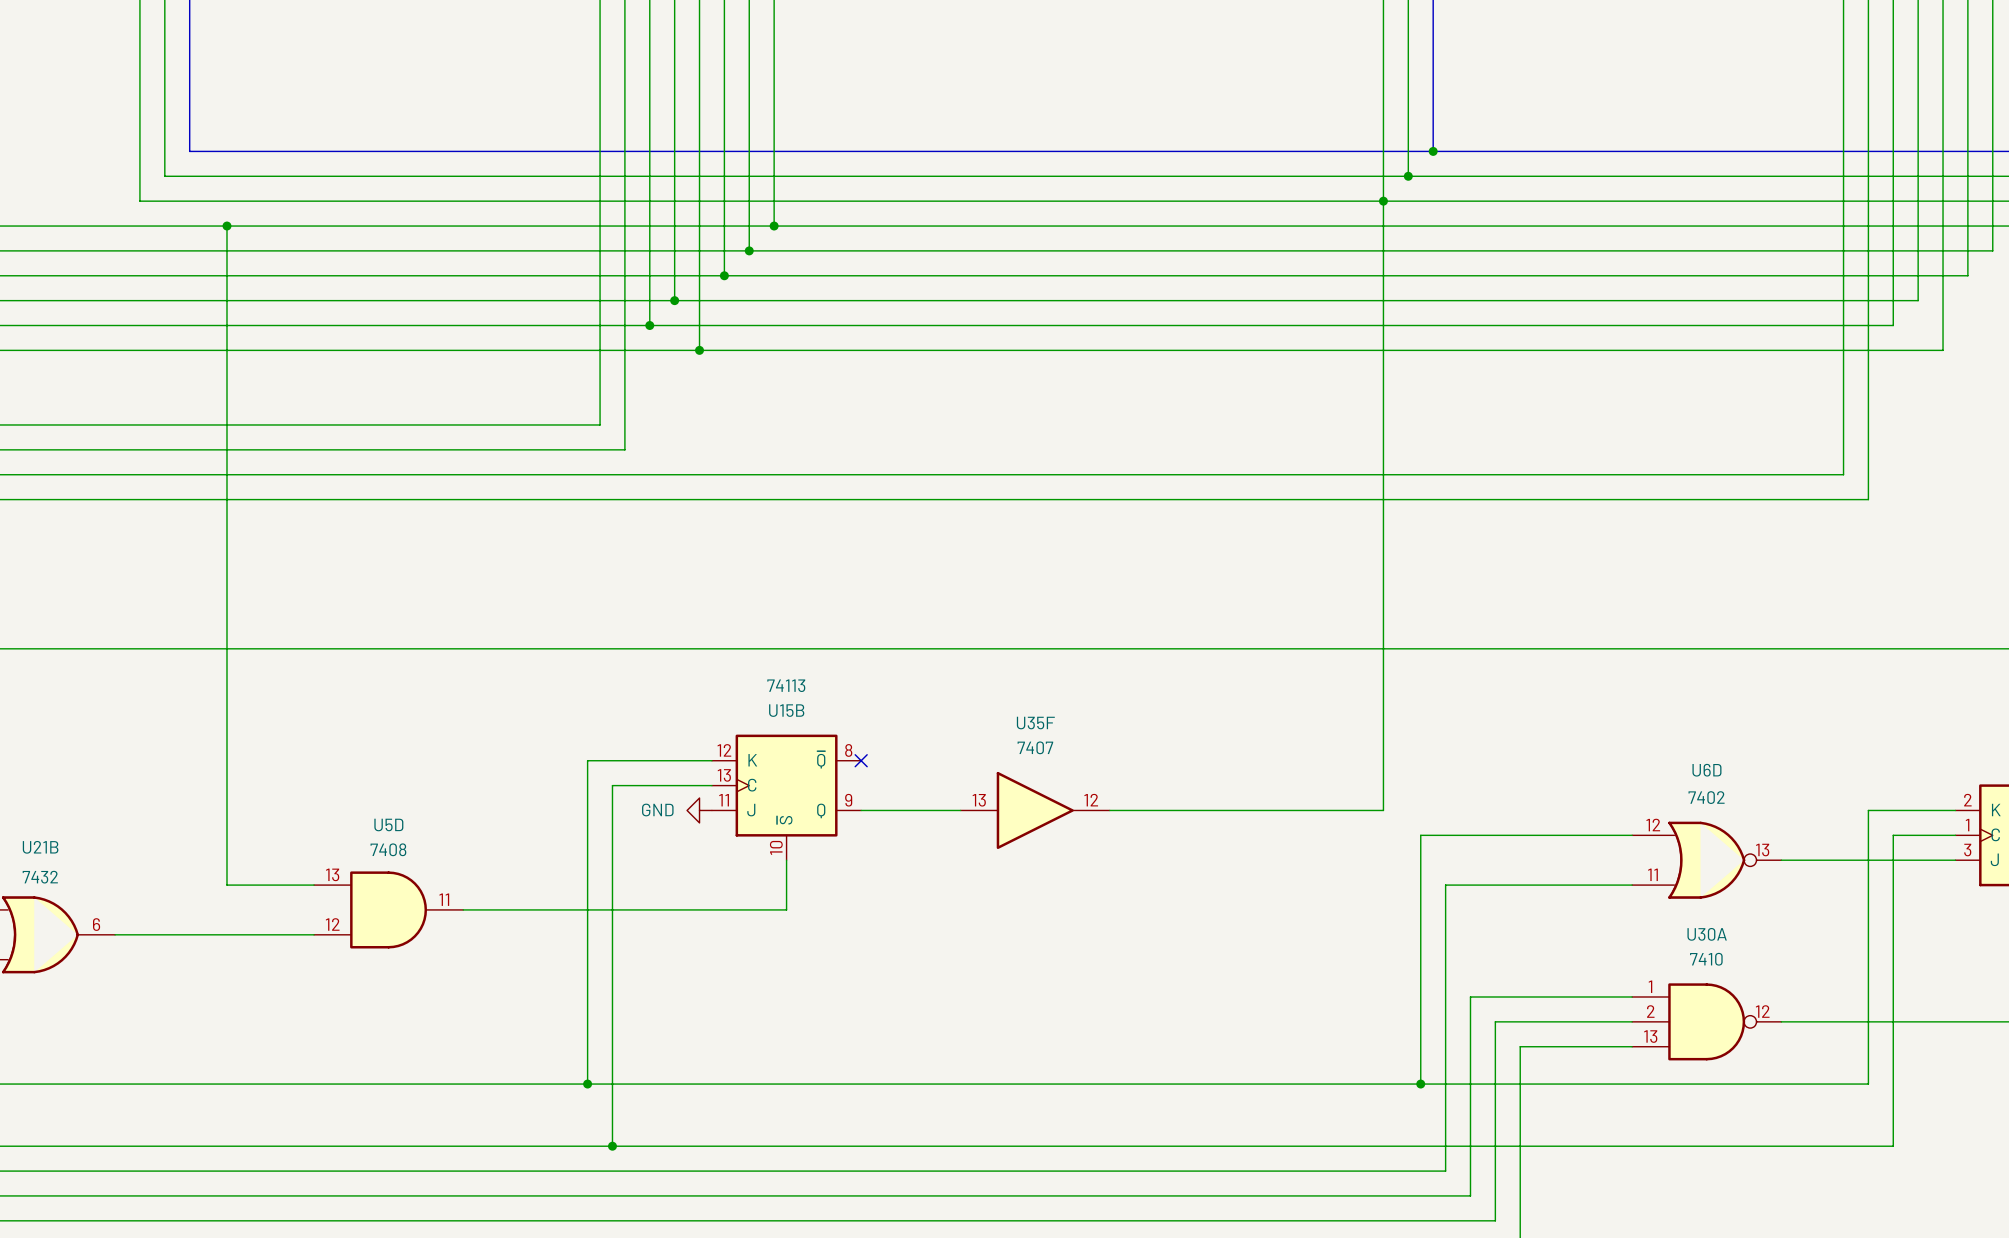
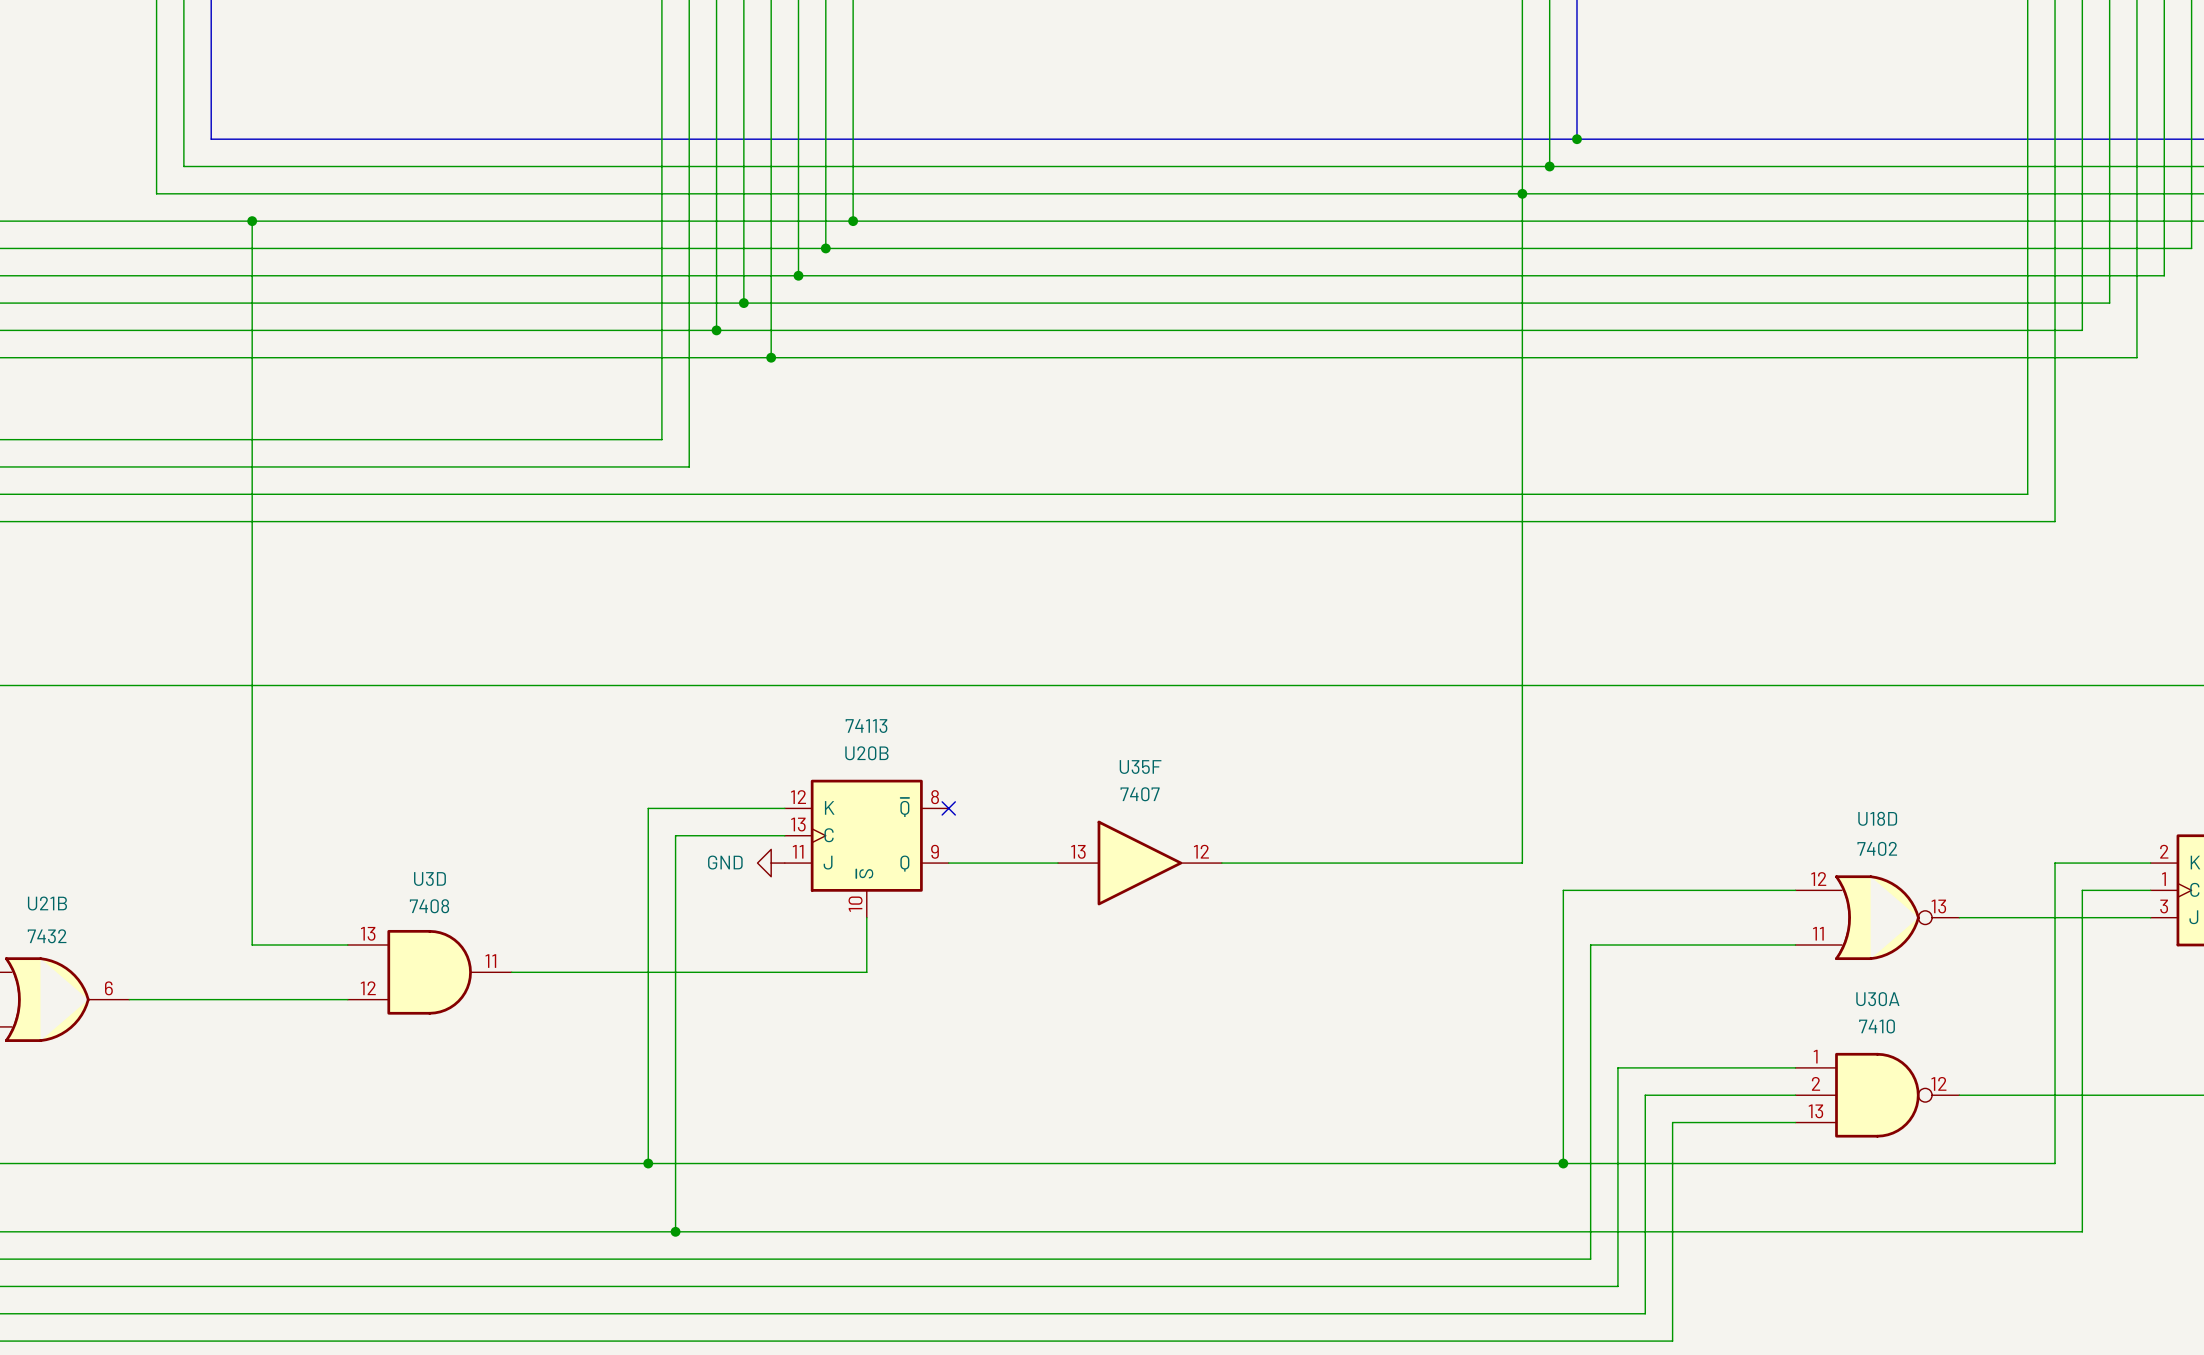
U15B name: U15B (786, 710) -> U20B (866, 753)
U6D name: U6D (1706, 770) -> U18D (1877, 818)
U5D name: U5D (388, 825) -> U3D (429, 879)

